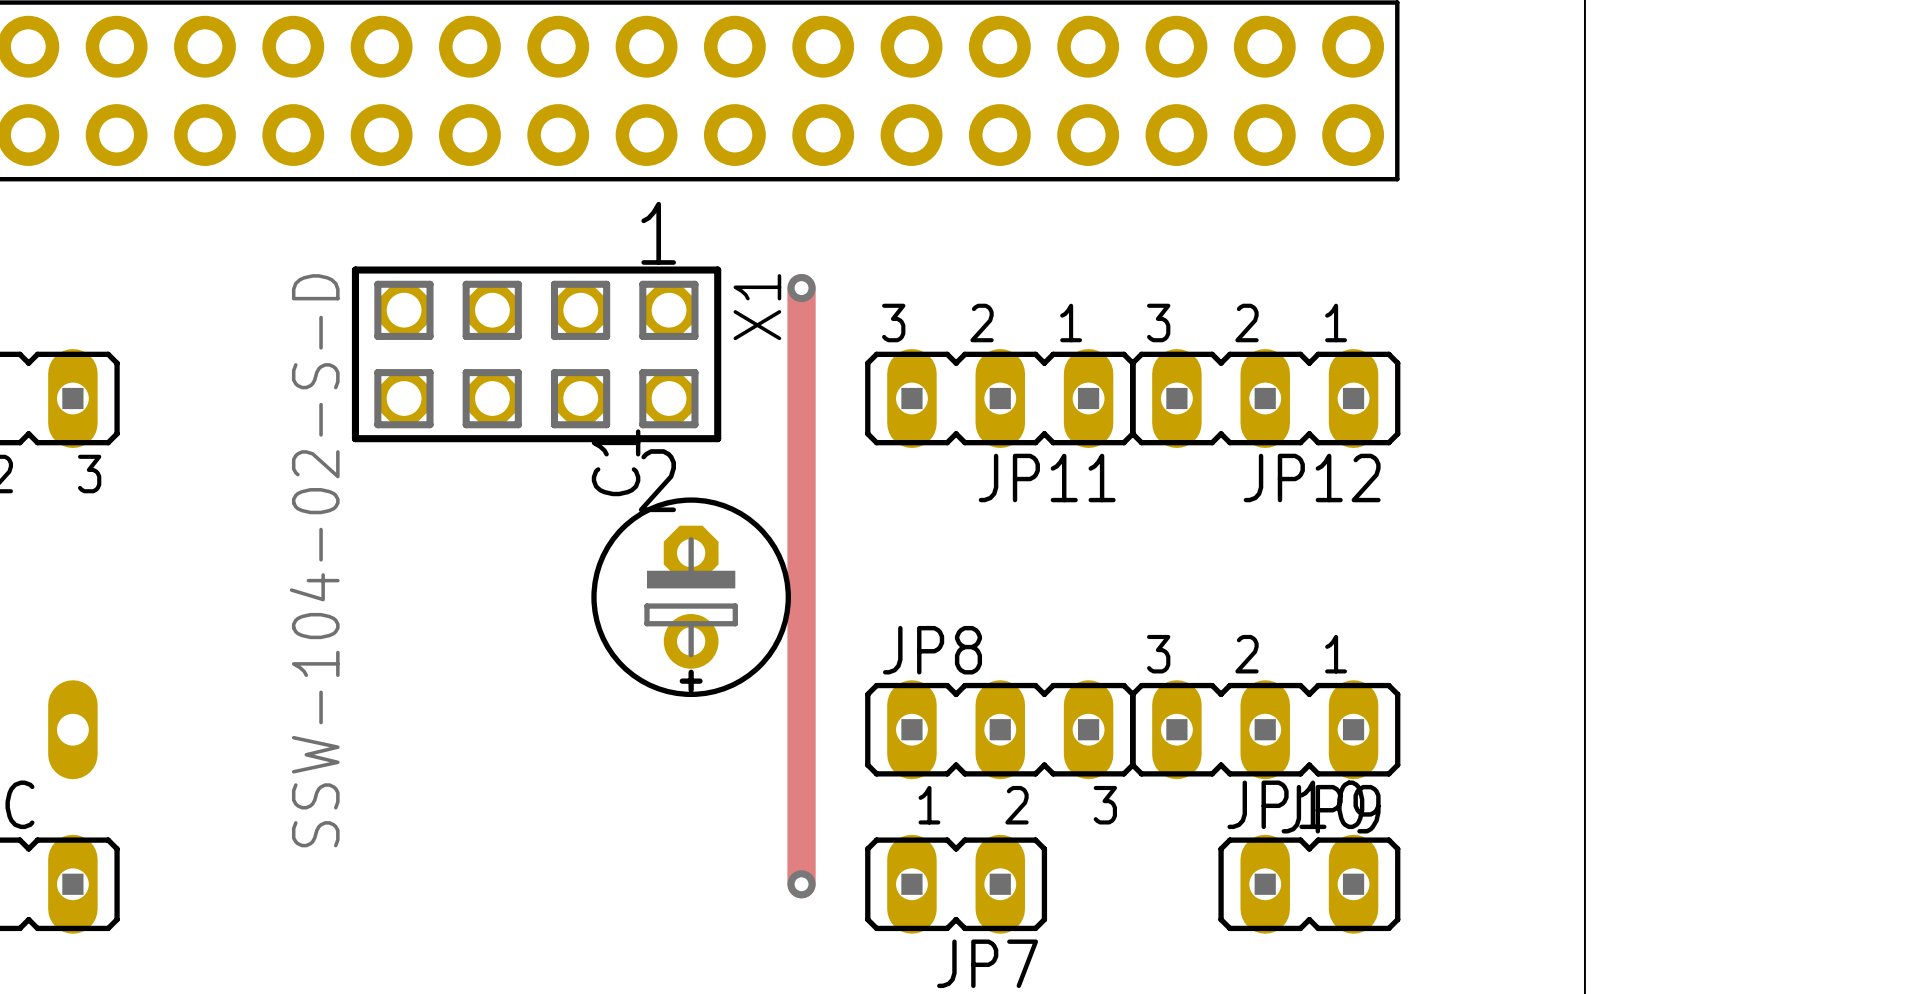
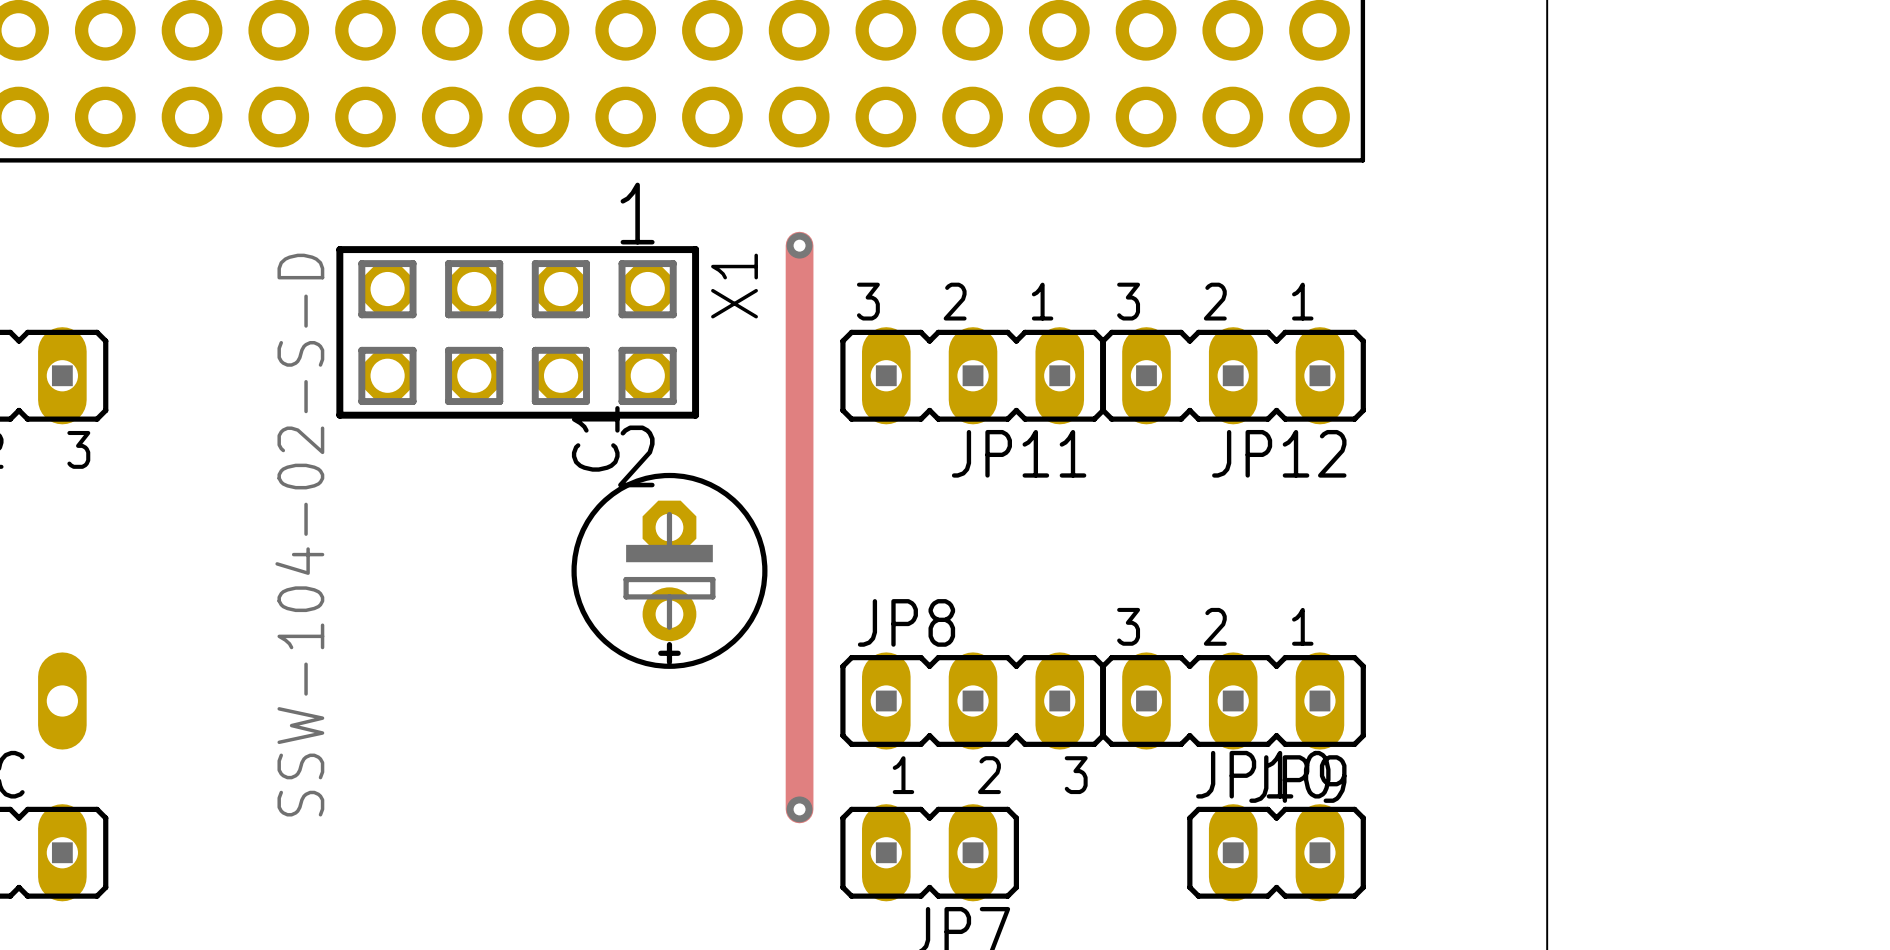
track: none -> (799, 245) (799, 809)
track: (801, 288) (801, 884) -> none
via position: (801, 288) -> (799, 245)
via: none -> (799, 809)
via: (801, 884) -> none

